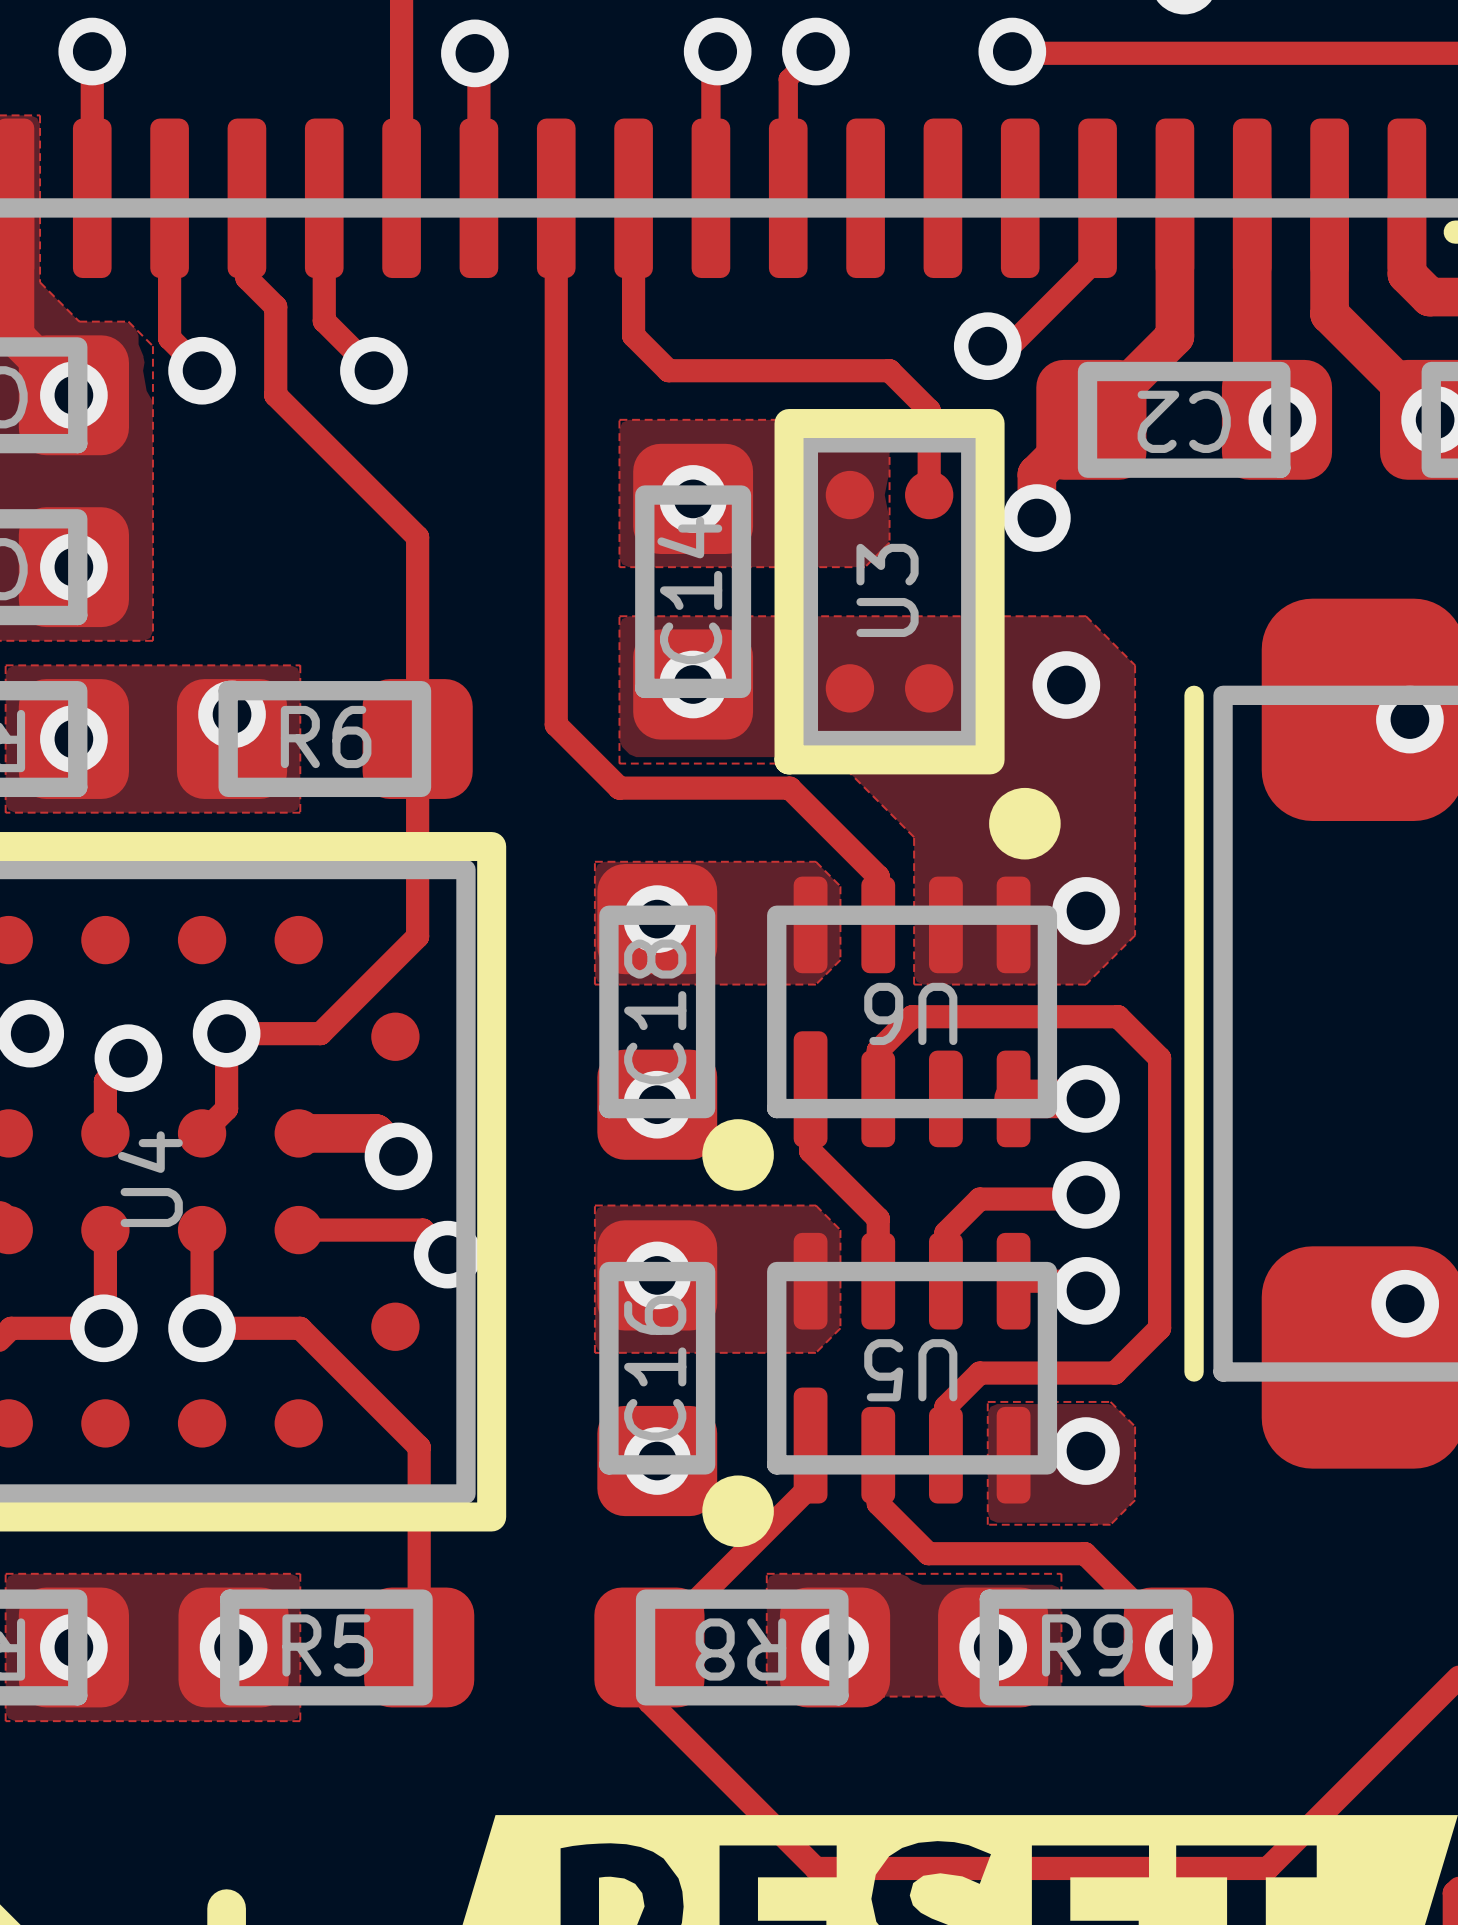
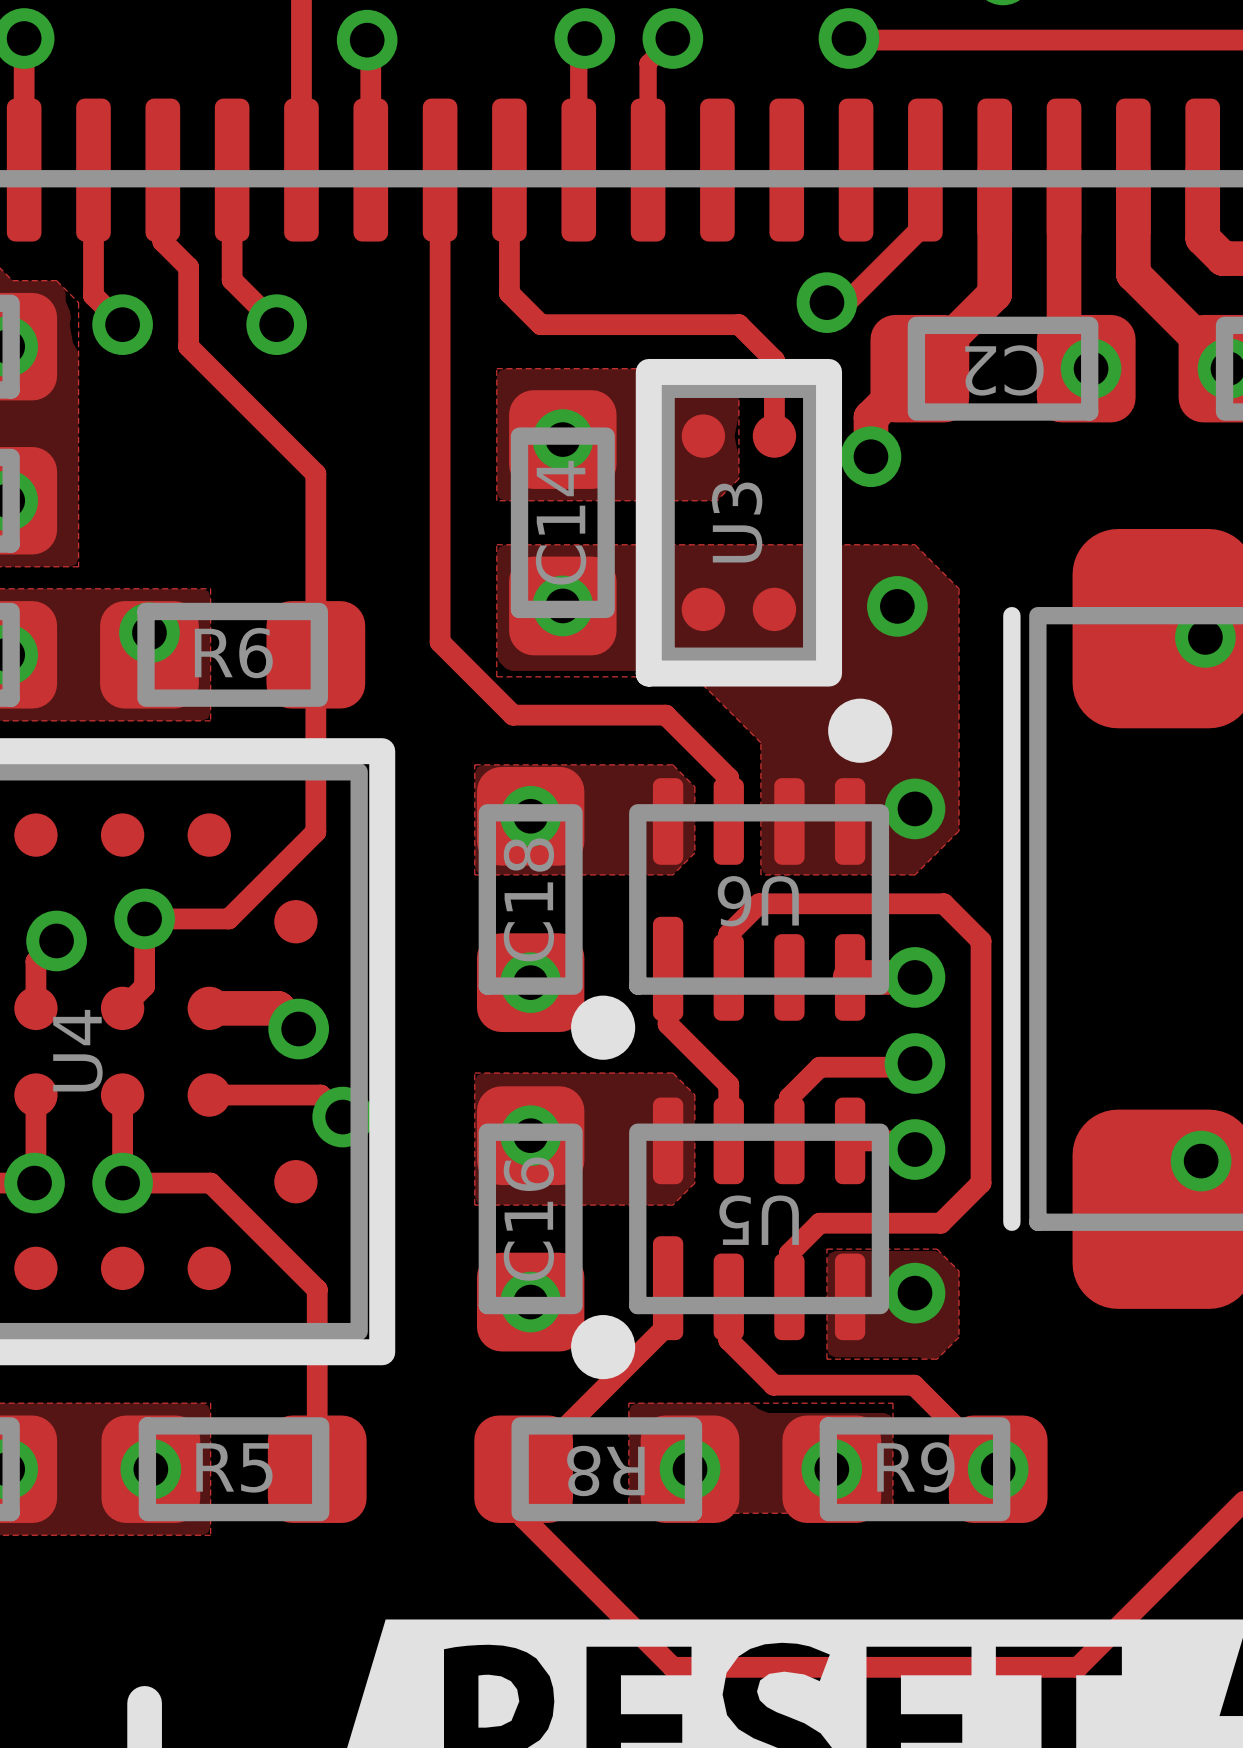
track: (619, 788) (789, 788) (807, 806) -> (496, 698) (513, 715) (665, 715)

